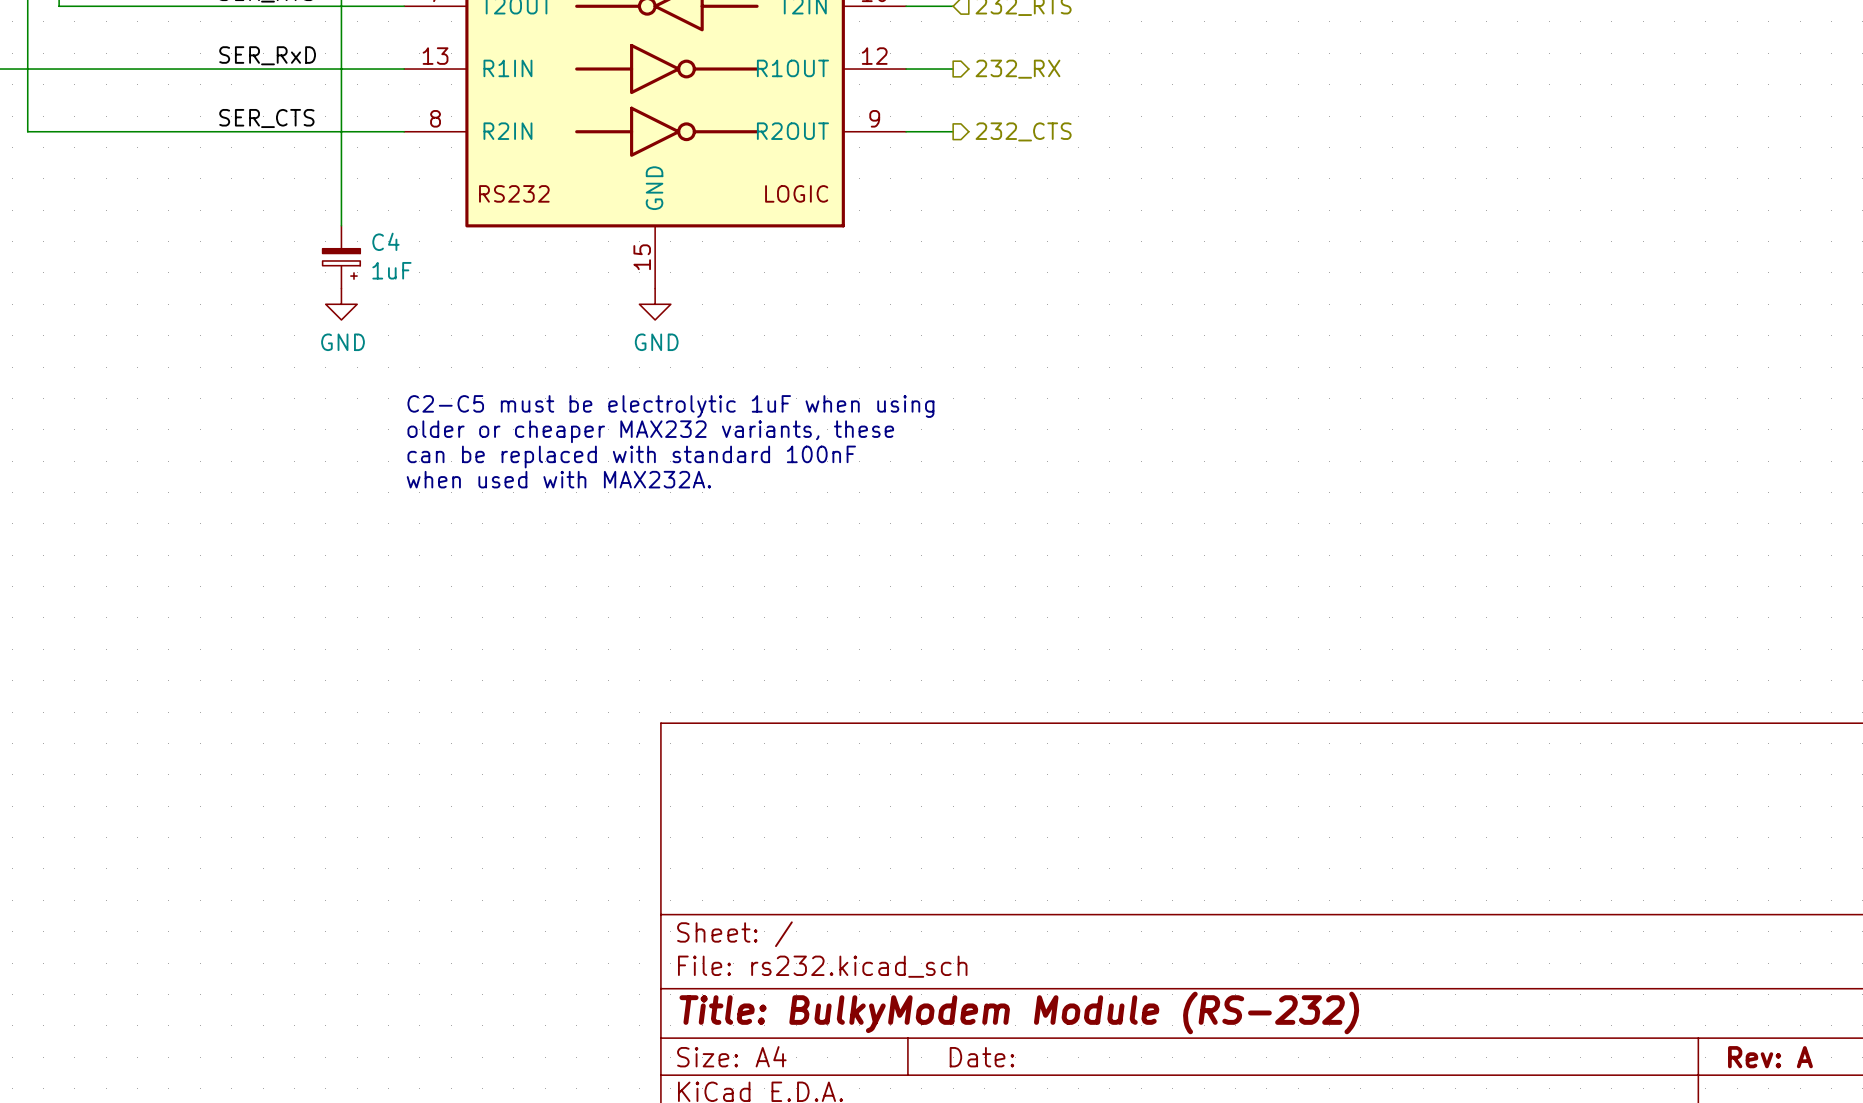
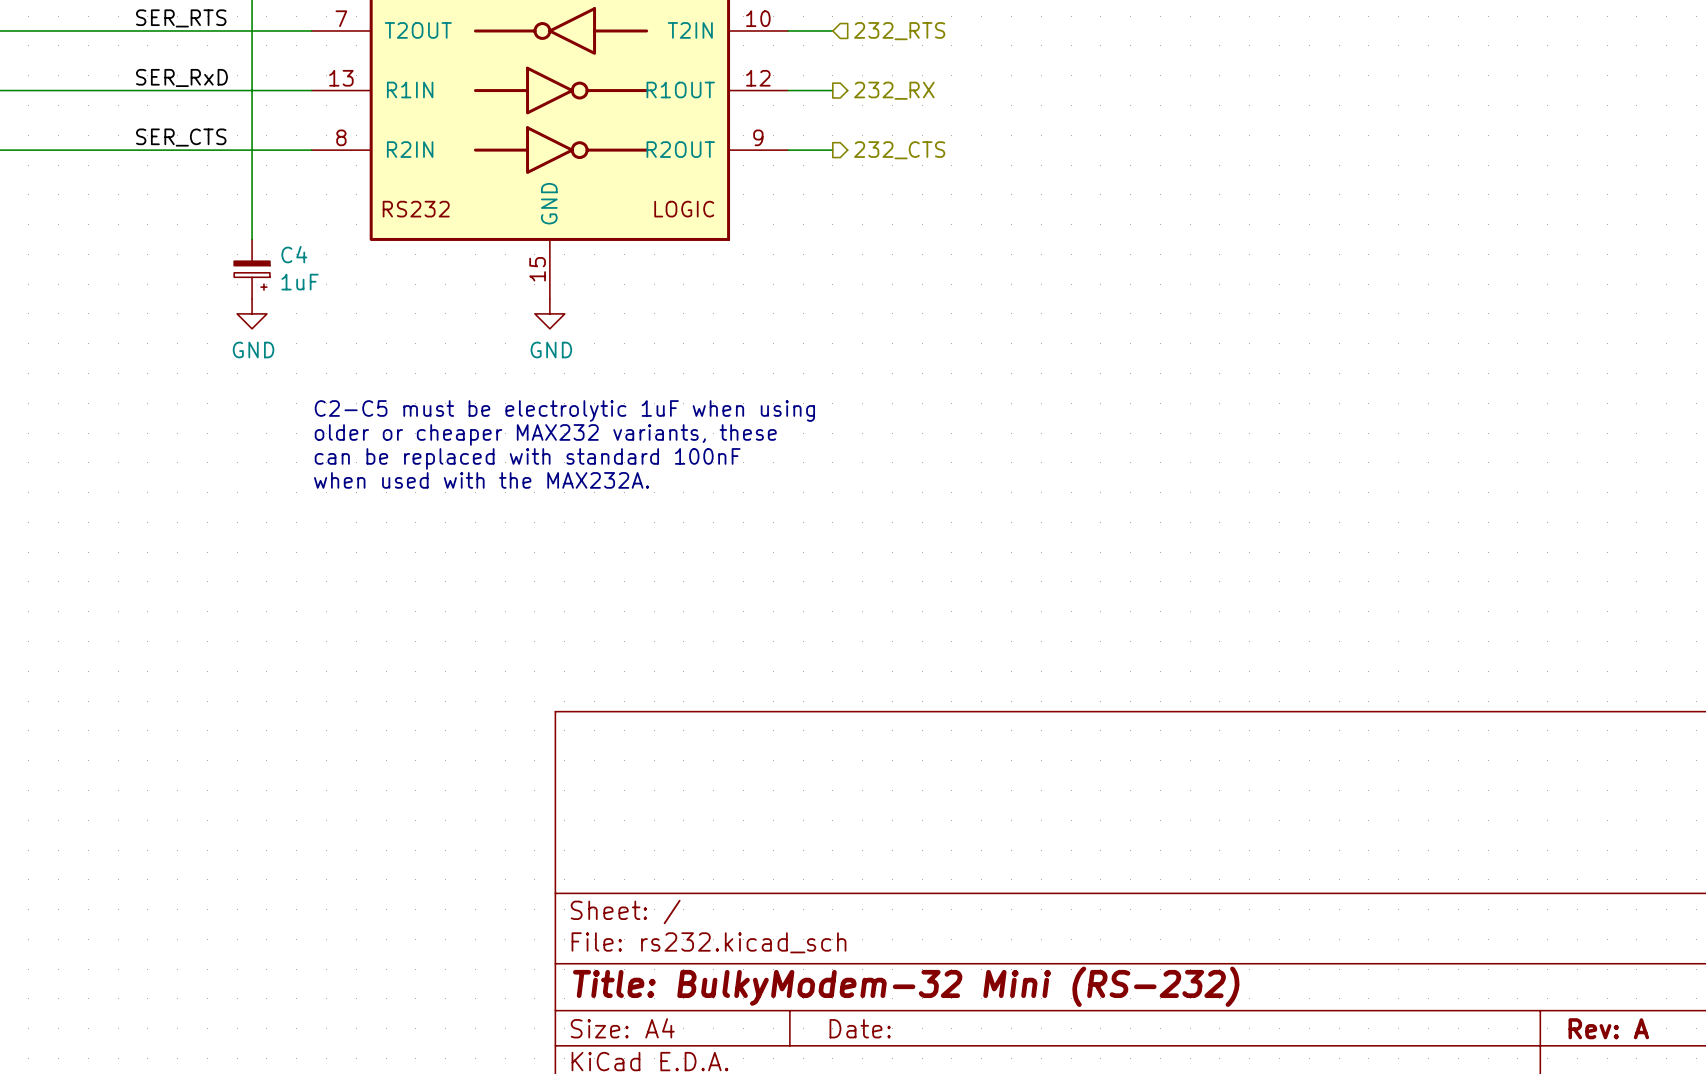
text: when used with MAX232A. (558, 479) -> when used with the MAX232A. (481, 480)
title block: Title: BulkyModem Module (RS-232) (1019, 1012) -> Title: BulkyModem-32 Mini (RS-232) (906, 986)

